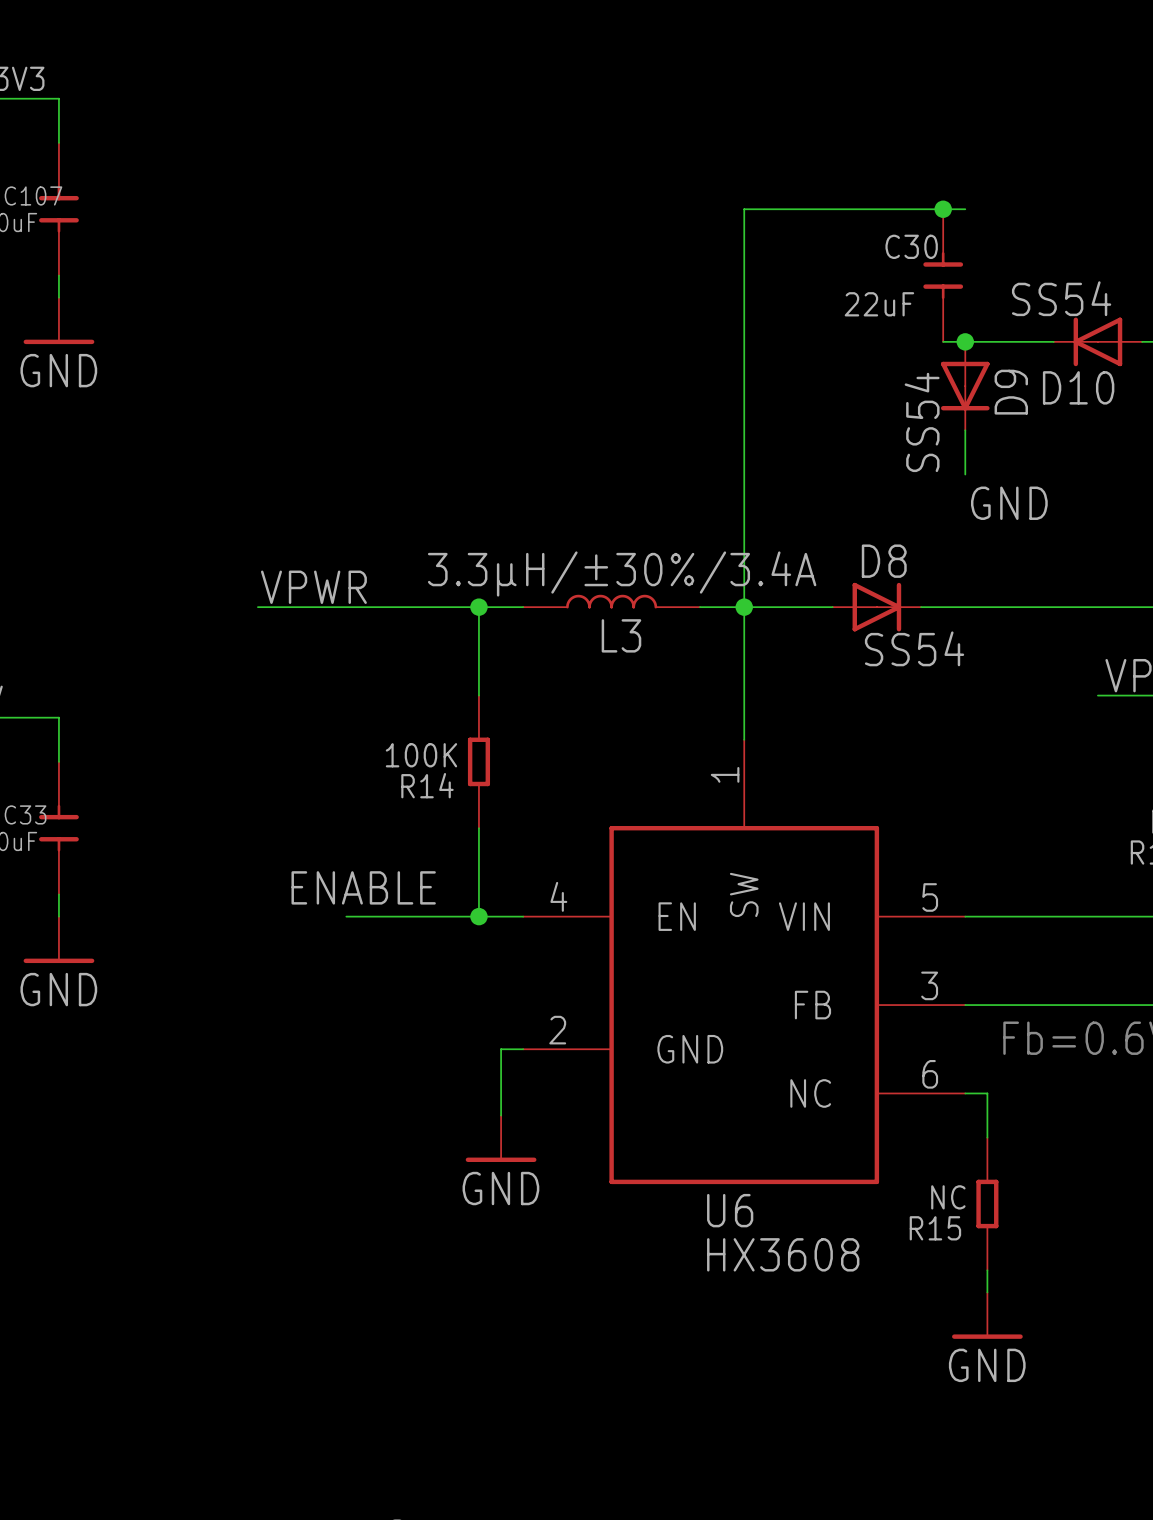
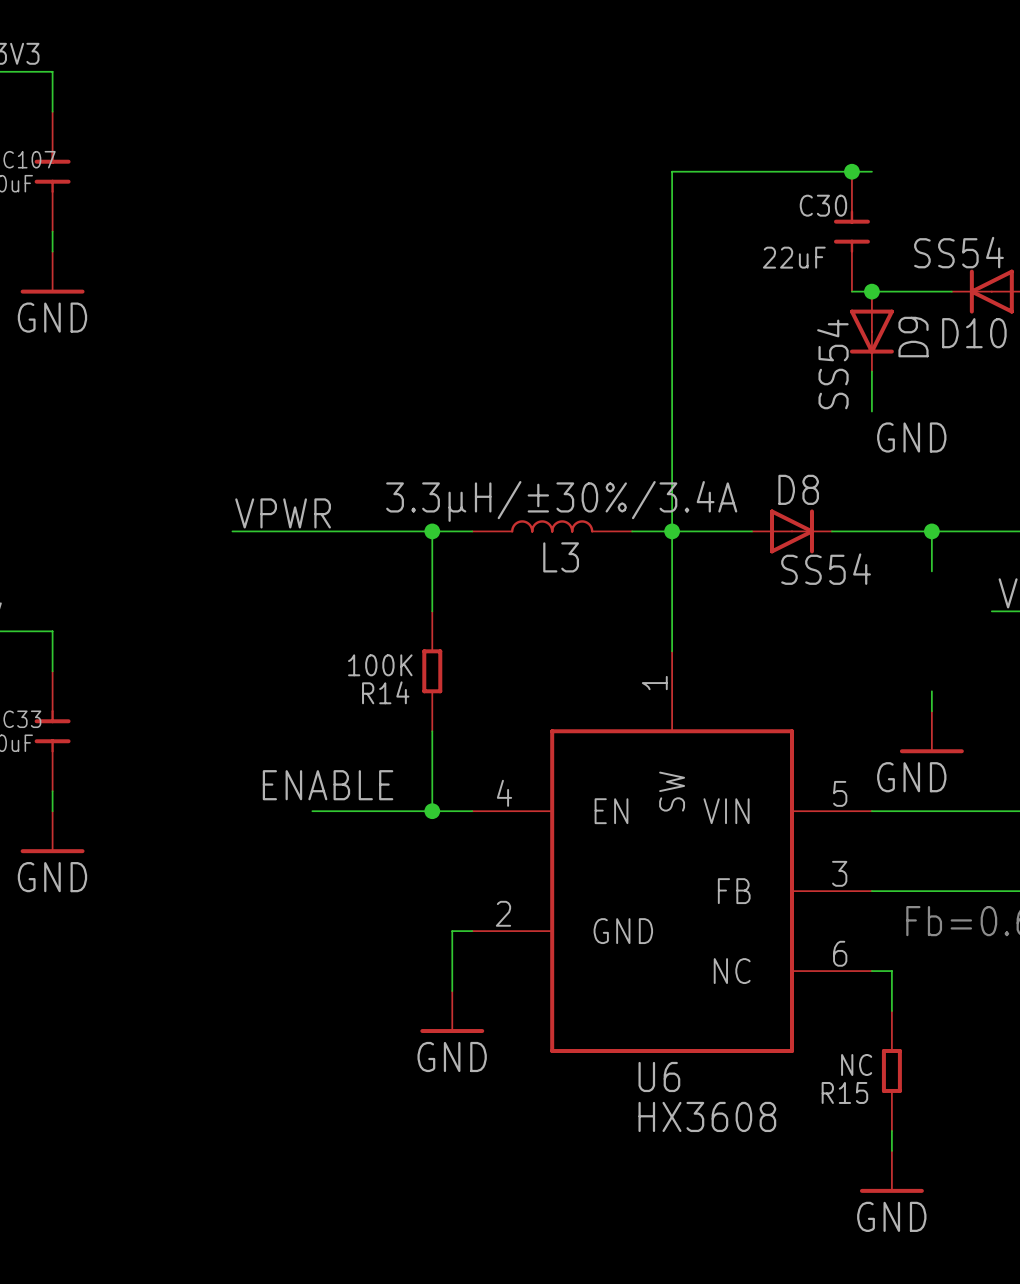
wire: none -> (931, 531) (931, 571)
junction: none -> (931, 531)
wire: none -> (931, 691) (931, 711)
power symbol: none -> GND (931, 732)

